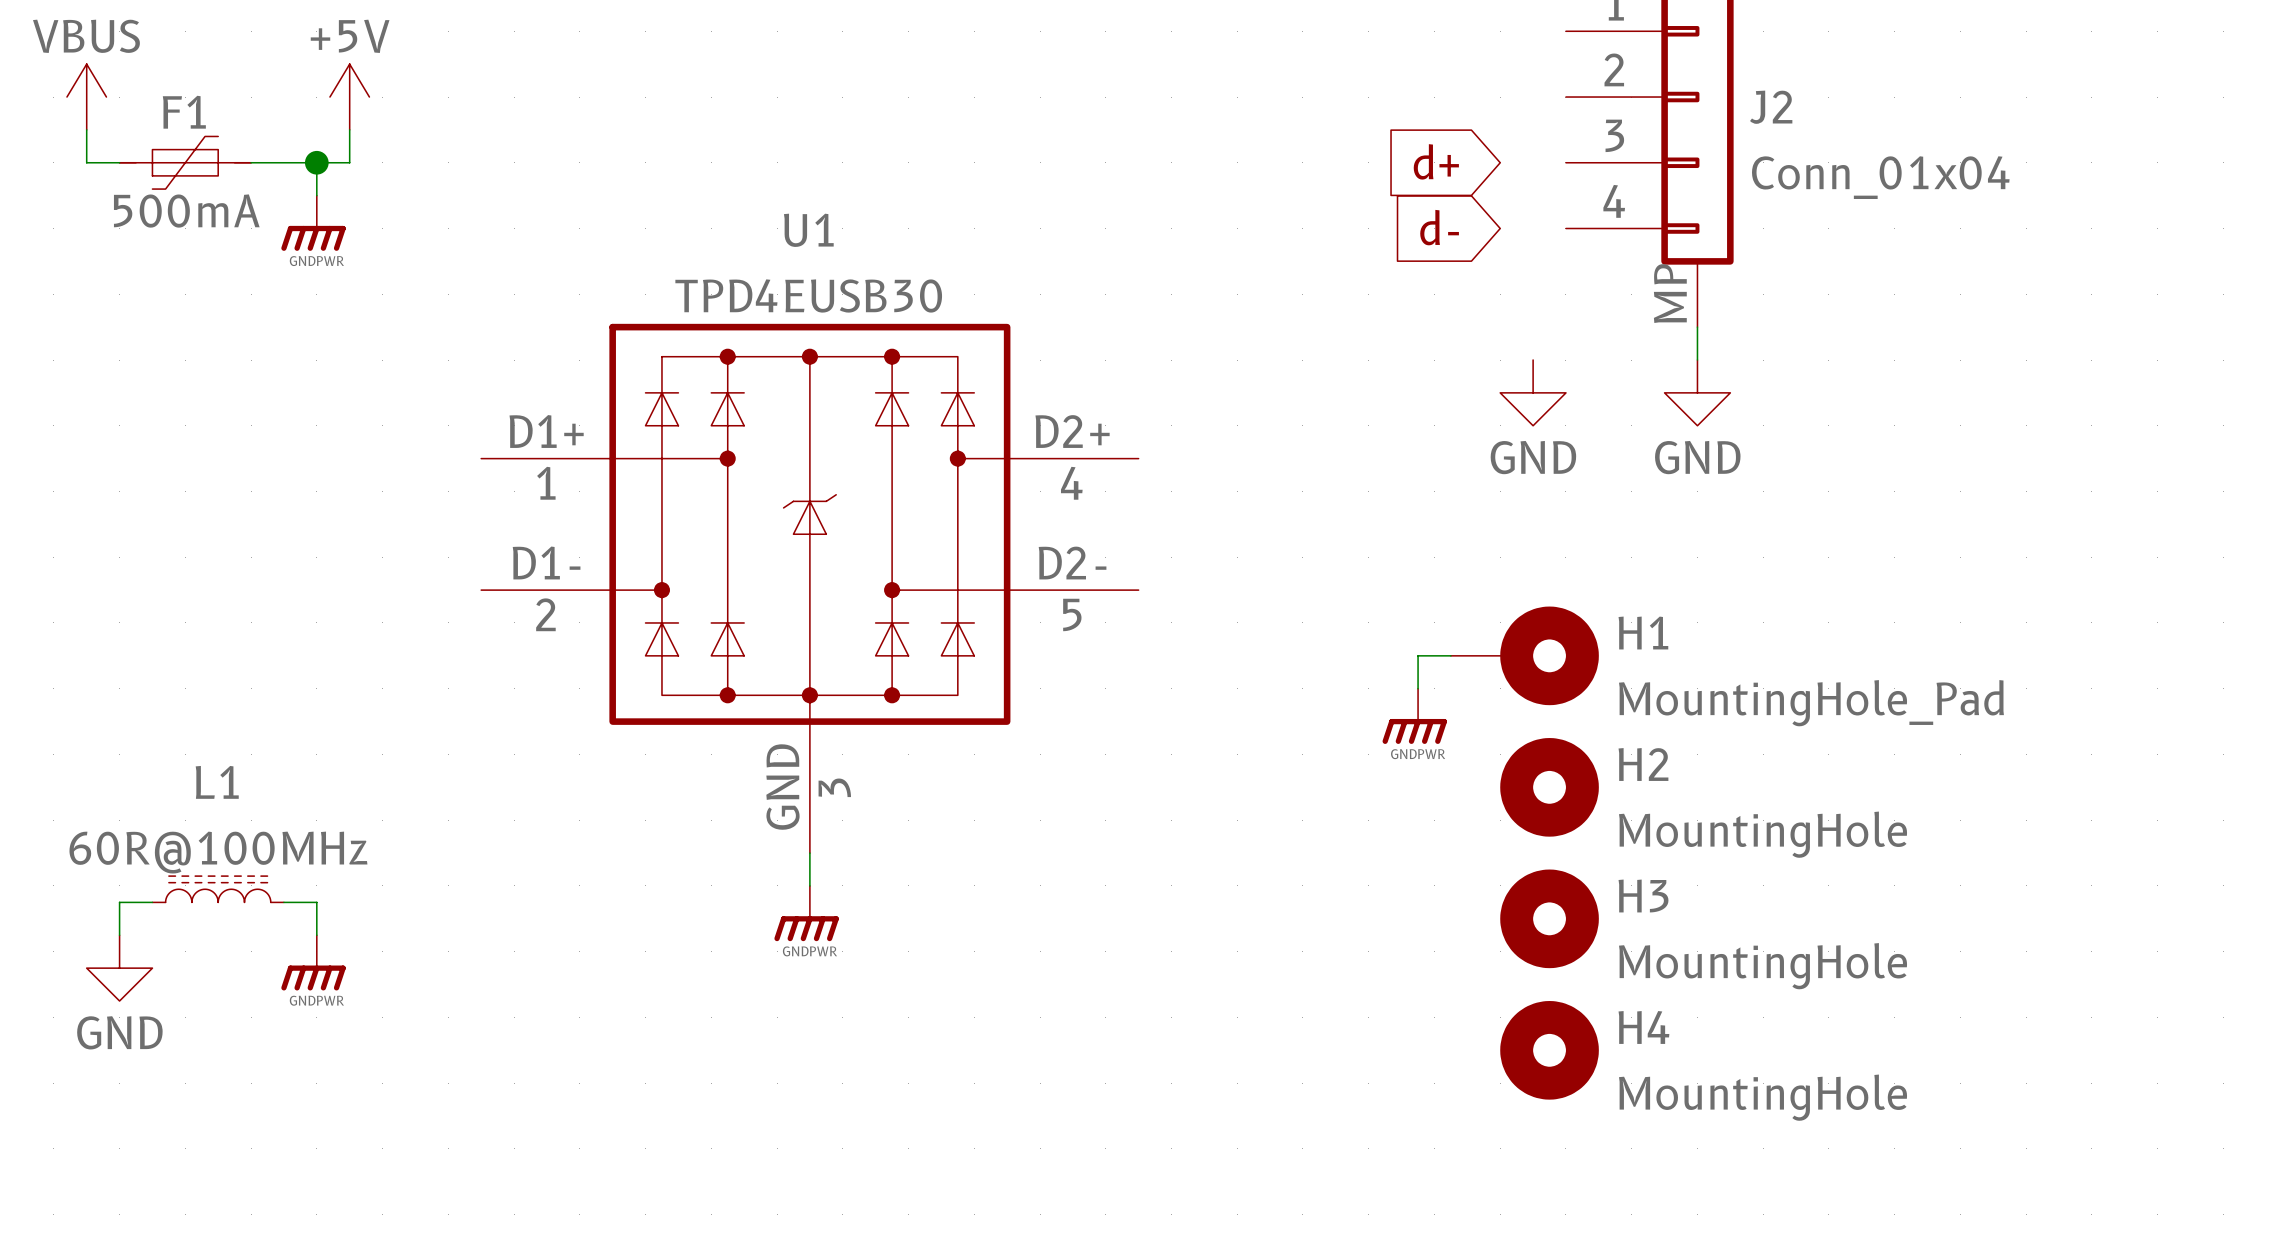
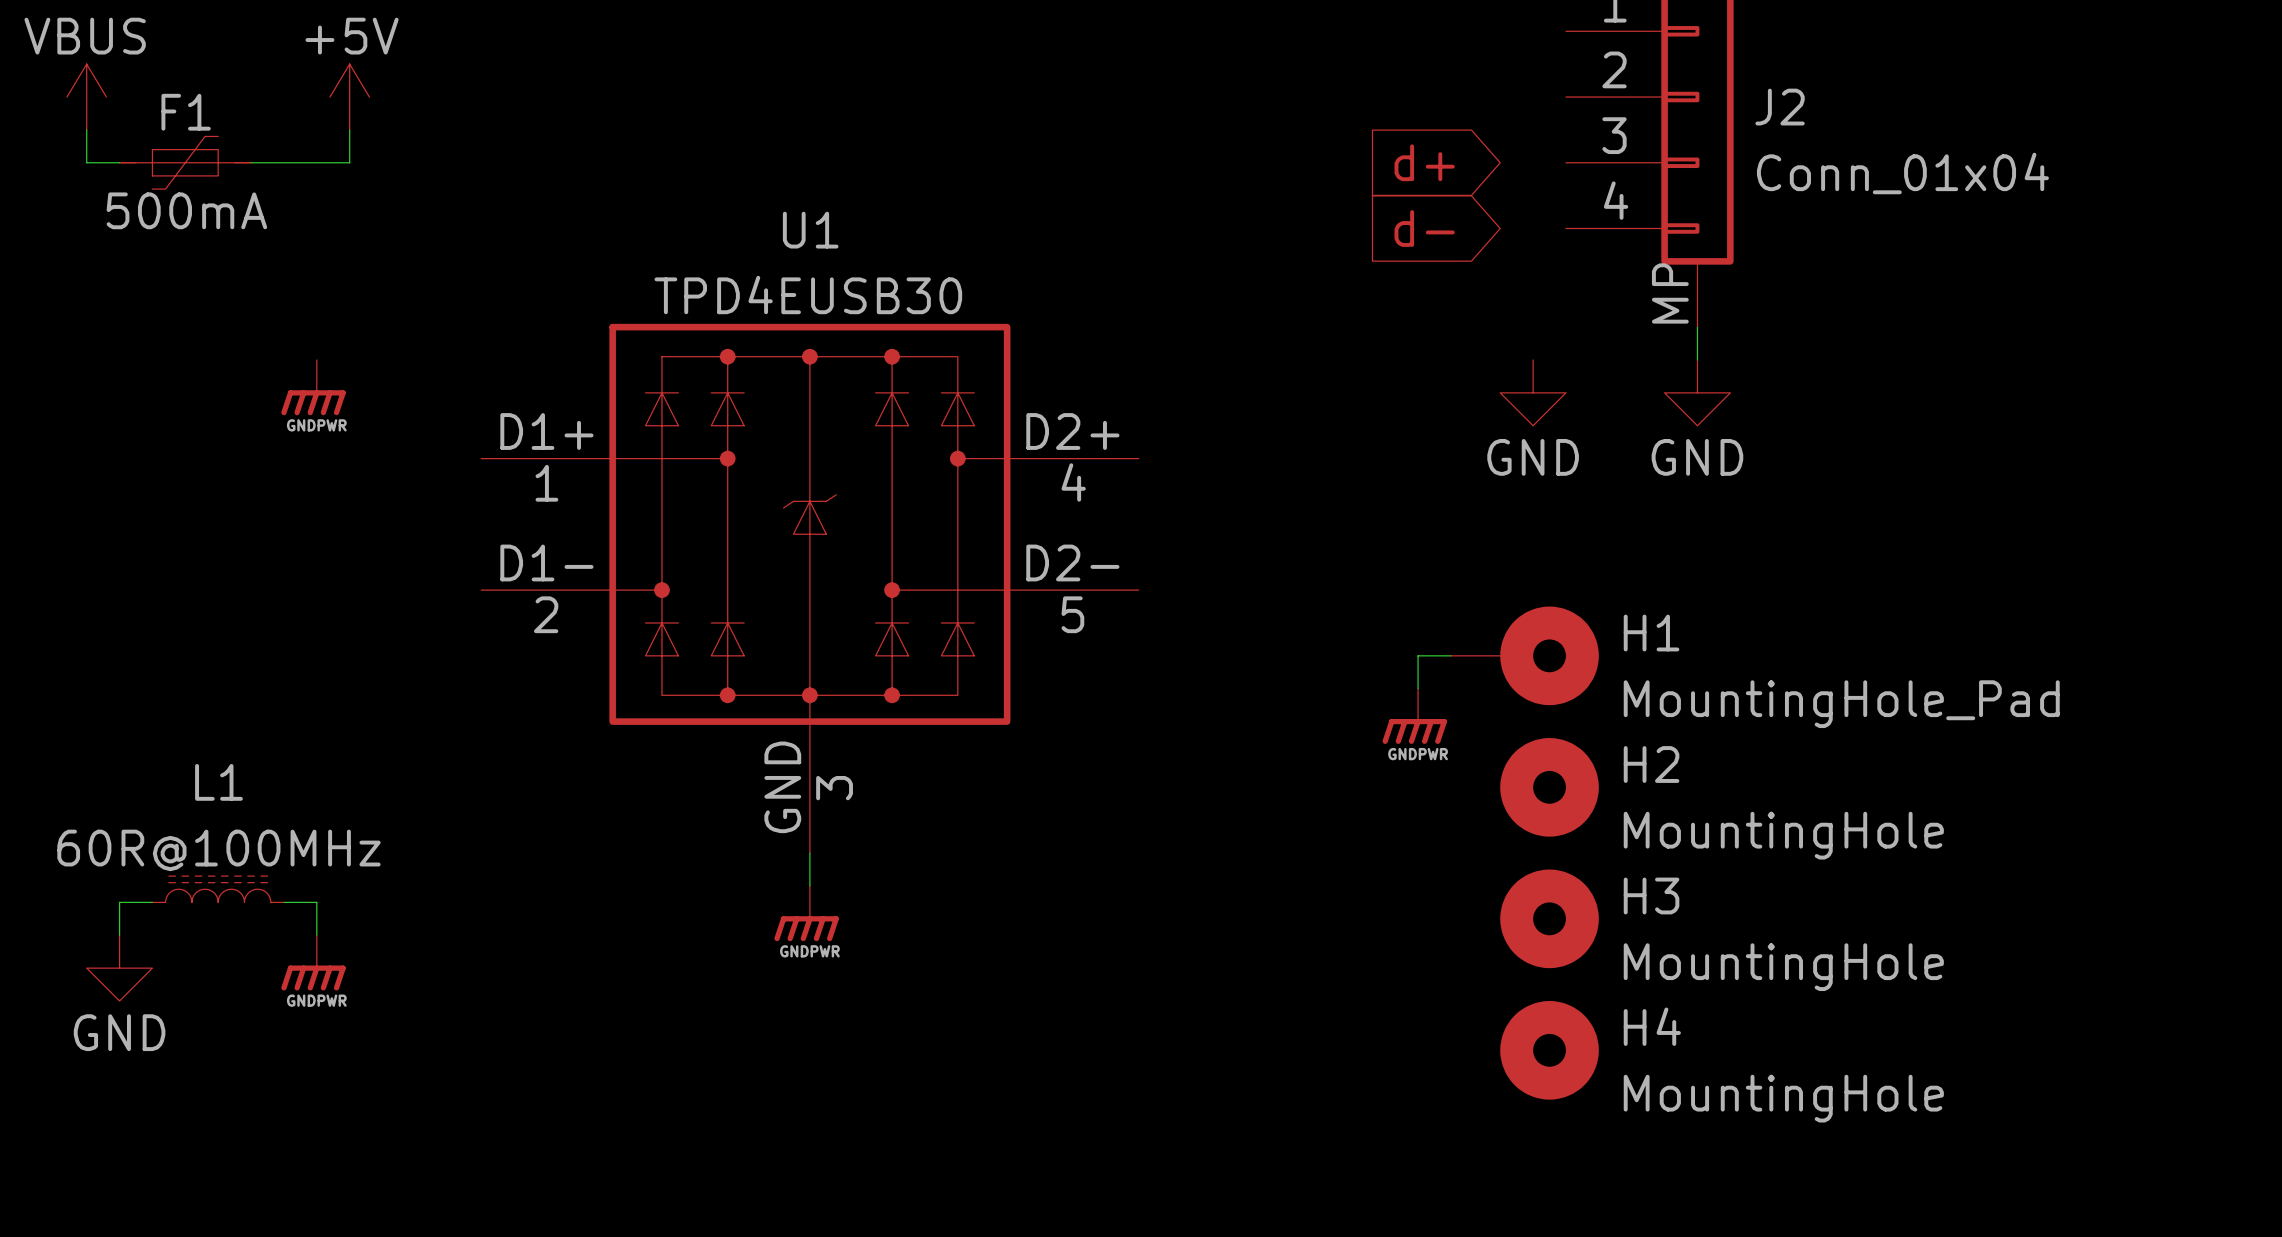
wire: (316, 162) (316, 195) -> none
junction: (316, 162) -> none
power symbol position: GNDPWR (313, 223) -> GNDPWR (313, 387)

